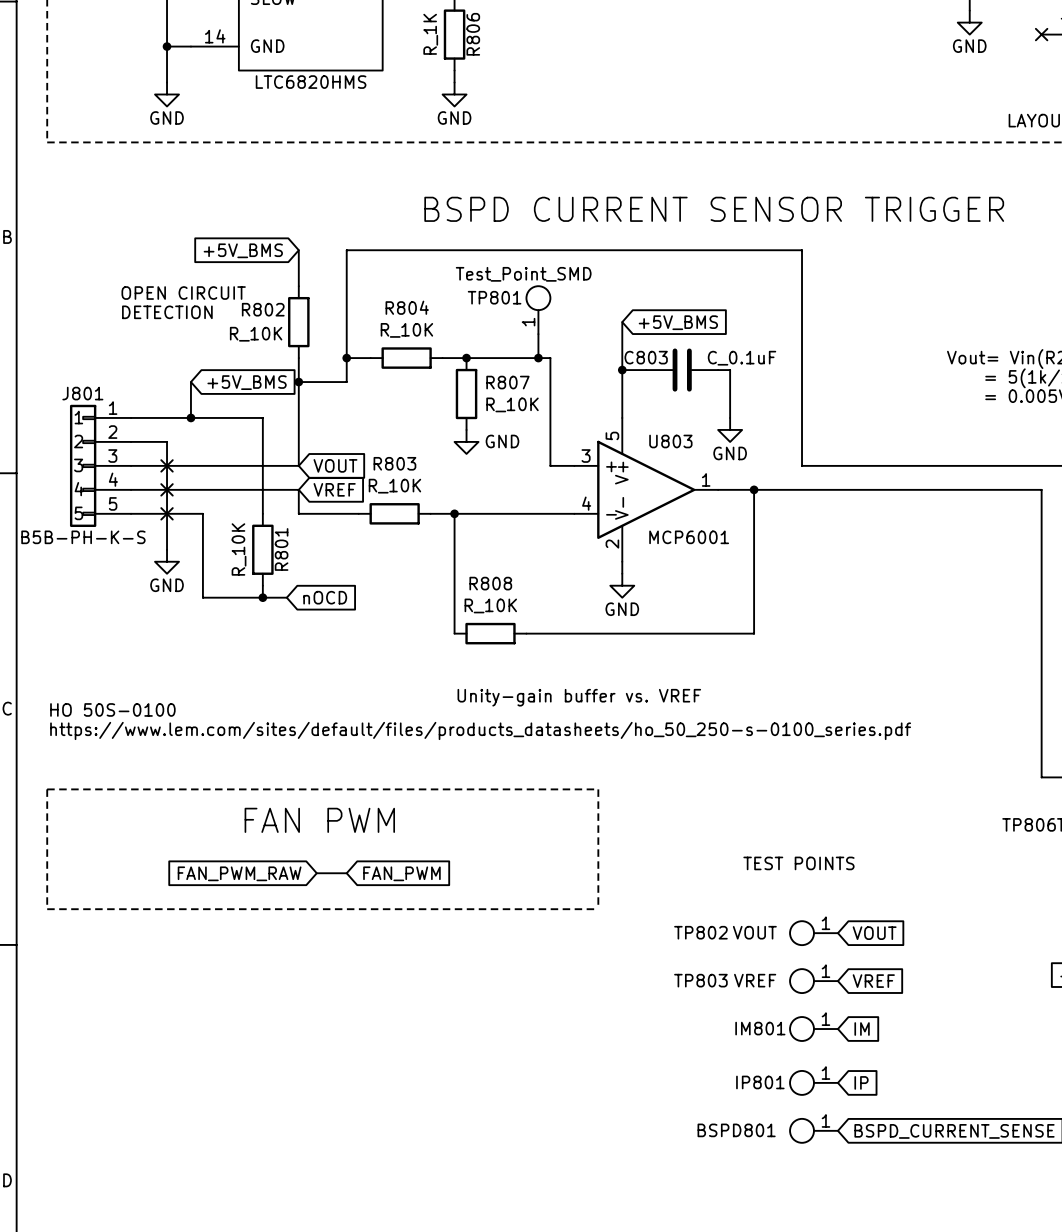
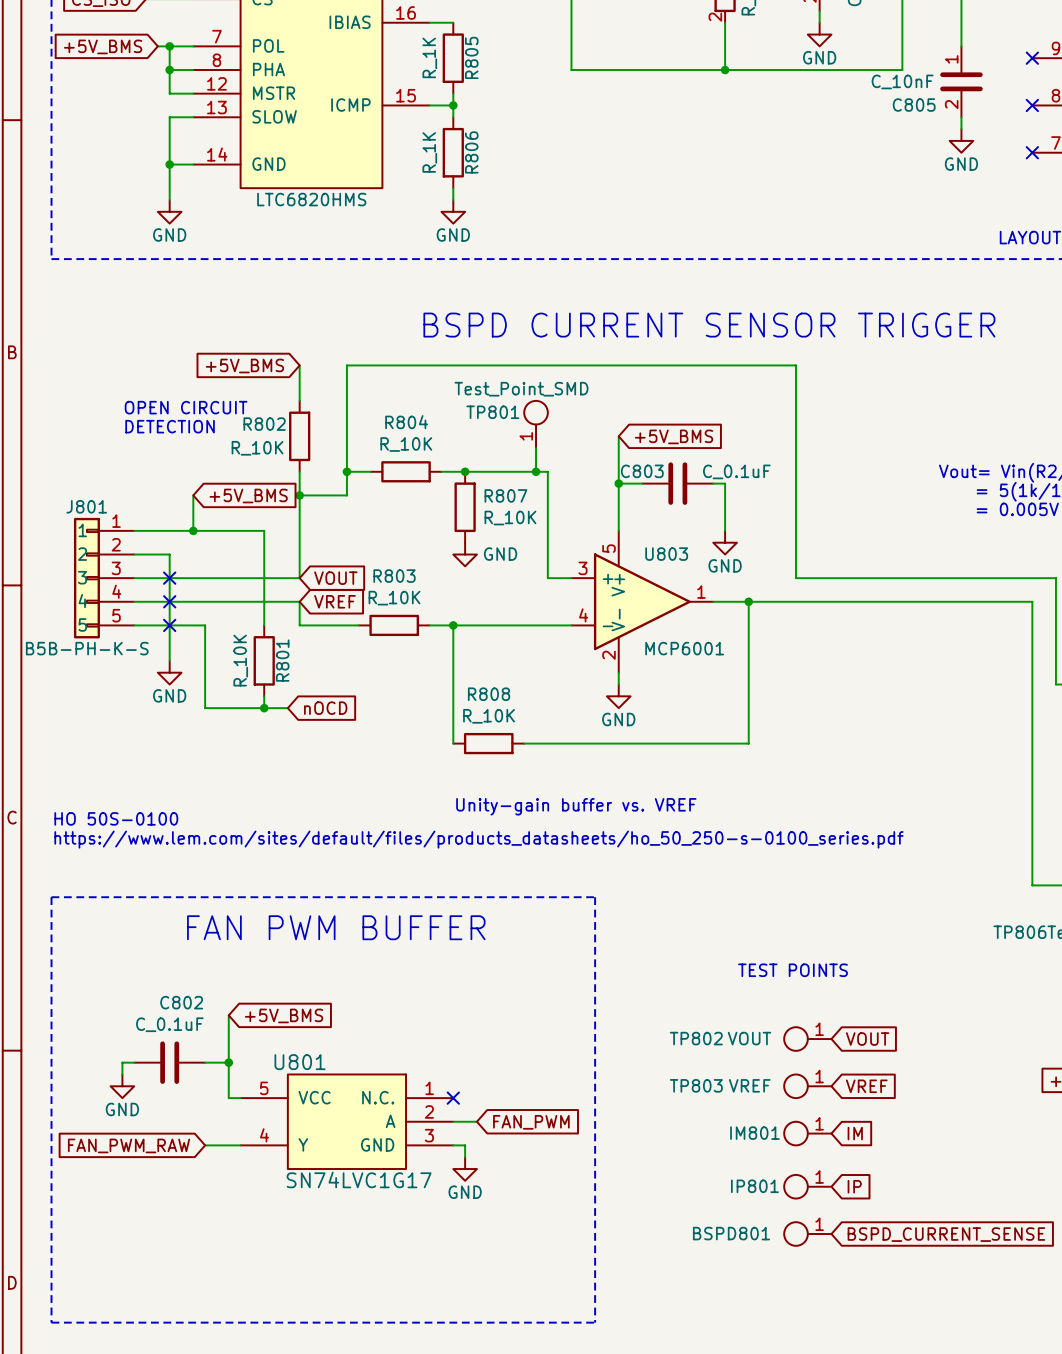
text: FAN PWM (319, 820) -> FAN PWM BUFFER (336, 927)
global label position: FAN_PWM_RAW (239, 873) -> FAN_PWM_RAW (129, 1145)
wire: (316, 873) (346, 873) -> none
global label position: FAN_PWM (401, 873) -> FAN_PWM (531, 1122)
line: (47, 909) (598, 909) -> (51, 1015) (51, 1322) (595, 1322) (595, 1015)
wire: none -> (228, 1015) (228, 1098) (240, 1098)
global label: none -> +5V_BMS (284, 1015)
wire: none -> (134, 1062) (122, 1062) (122, 1074)
C802: none -> C_0.1uF (169, 1062)
wire: none -> (205, 1062) (228, 1062)
junction: none -> (228, 1062)
power symbol: none -> GND (122, 1086)
no-connect mark: none -> (453, 1098)
U801: none -> SN74LVC1G17 (346, 1121)
wire: none -> (453, 1121) (476, 1121)
wire: none -> (205, 1145) (240, 1145)
wire: none -> (453, 1145) (465, 1145) (465, 1157)
power symbol: none -> GND (465, 1169)

